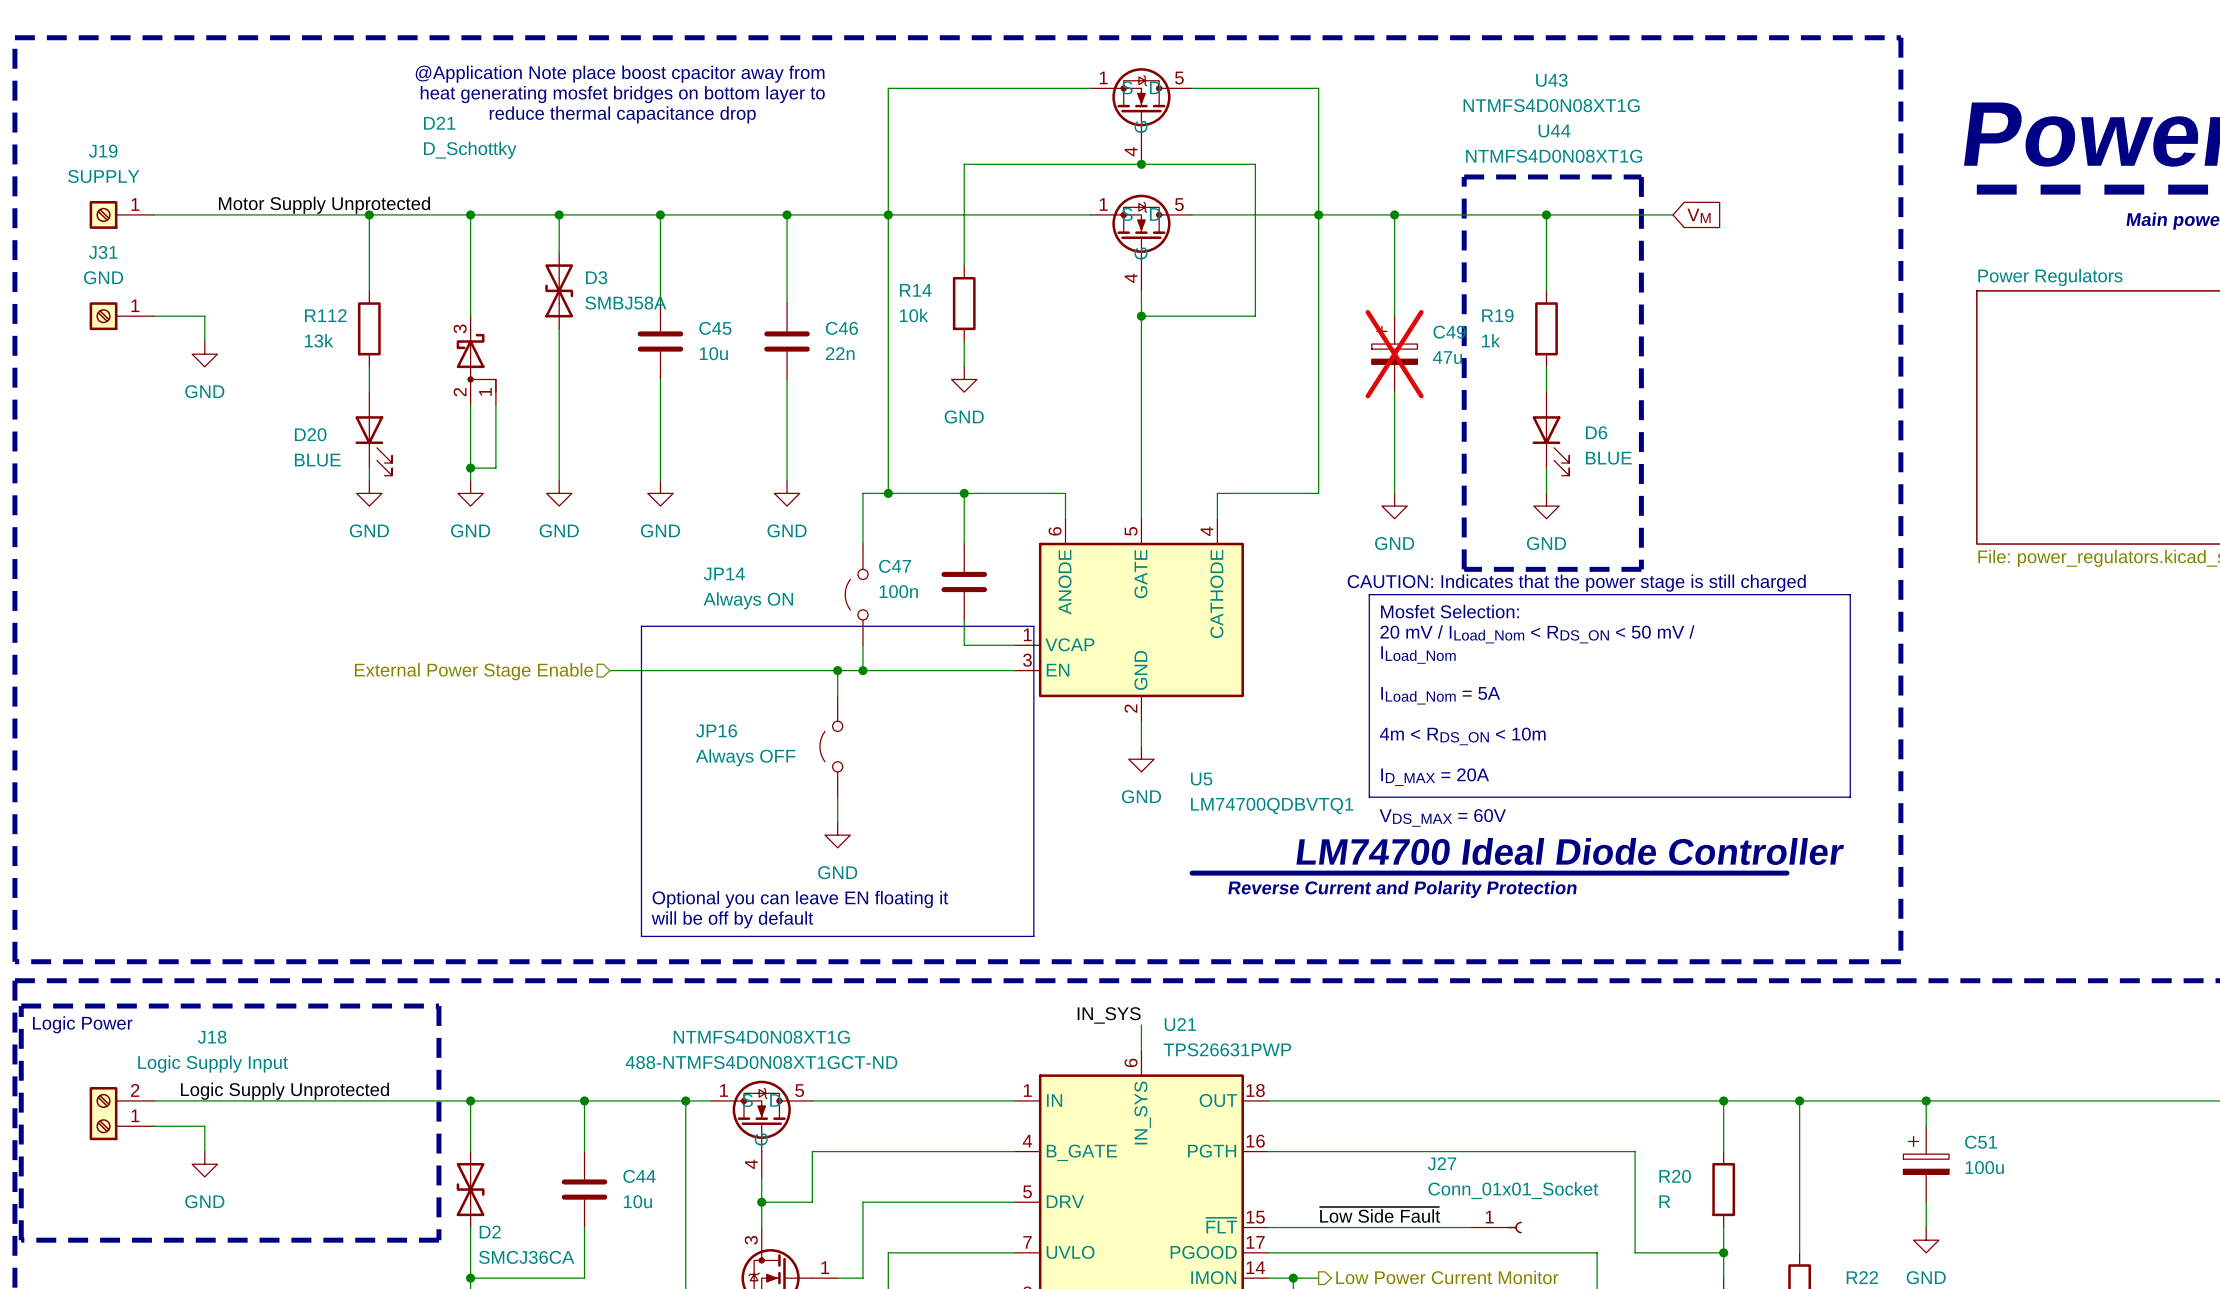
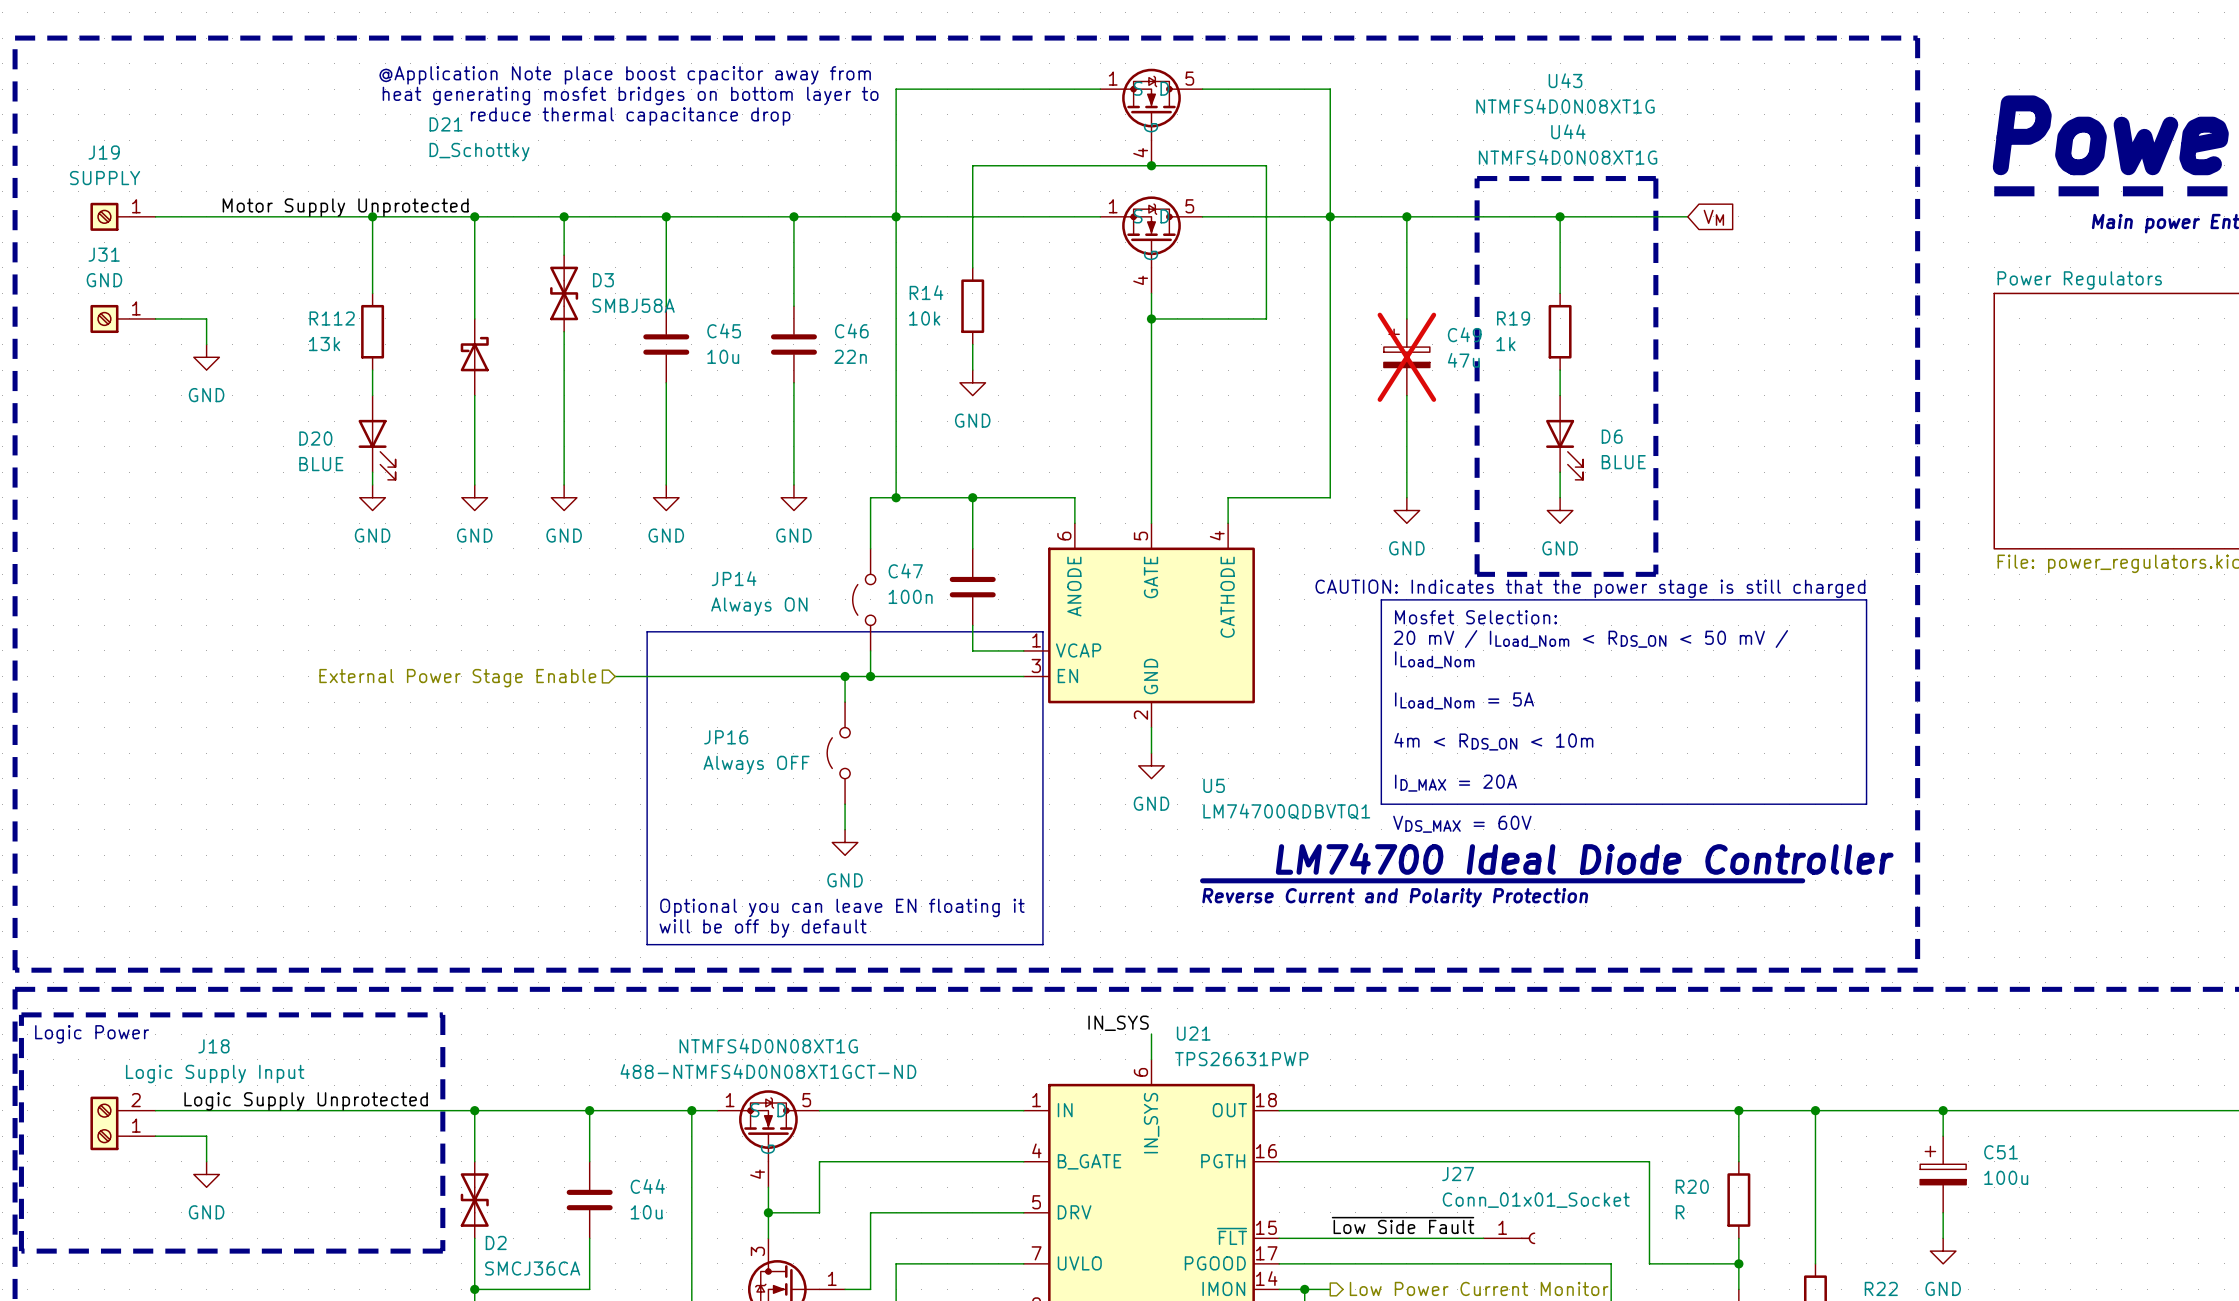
D21 symbol: [456, 316, 496, 405] -> [460, 318, 489, 396]
wire: (495, 404) (495, 468) (470, 468) -> none
junction: (470, 468) -> none

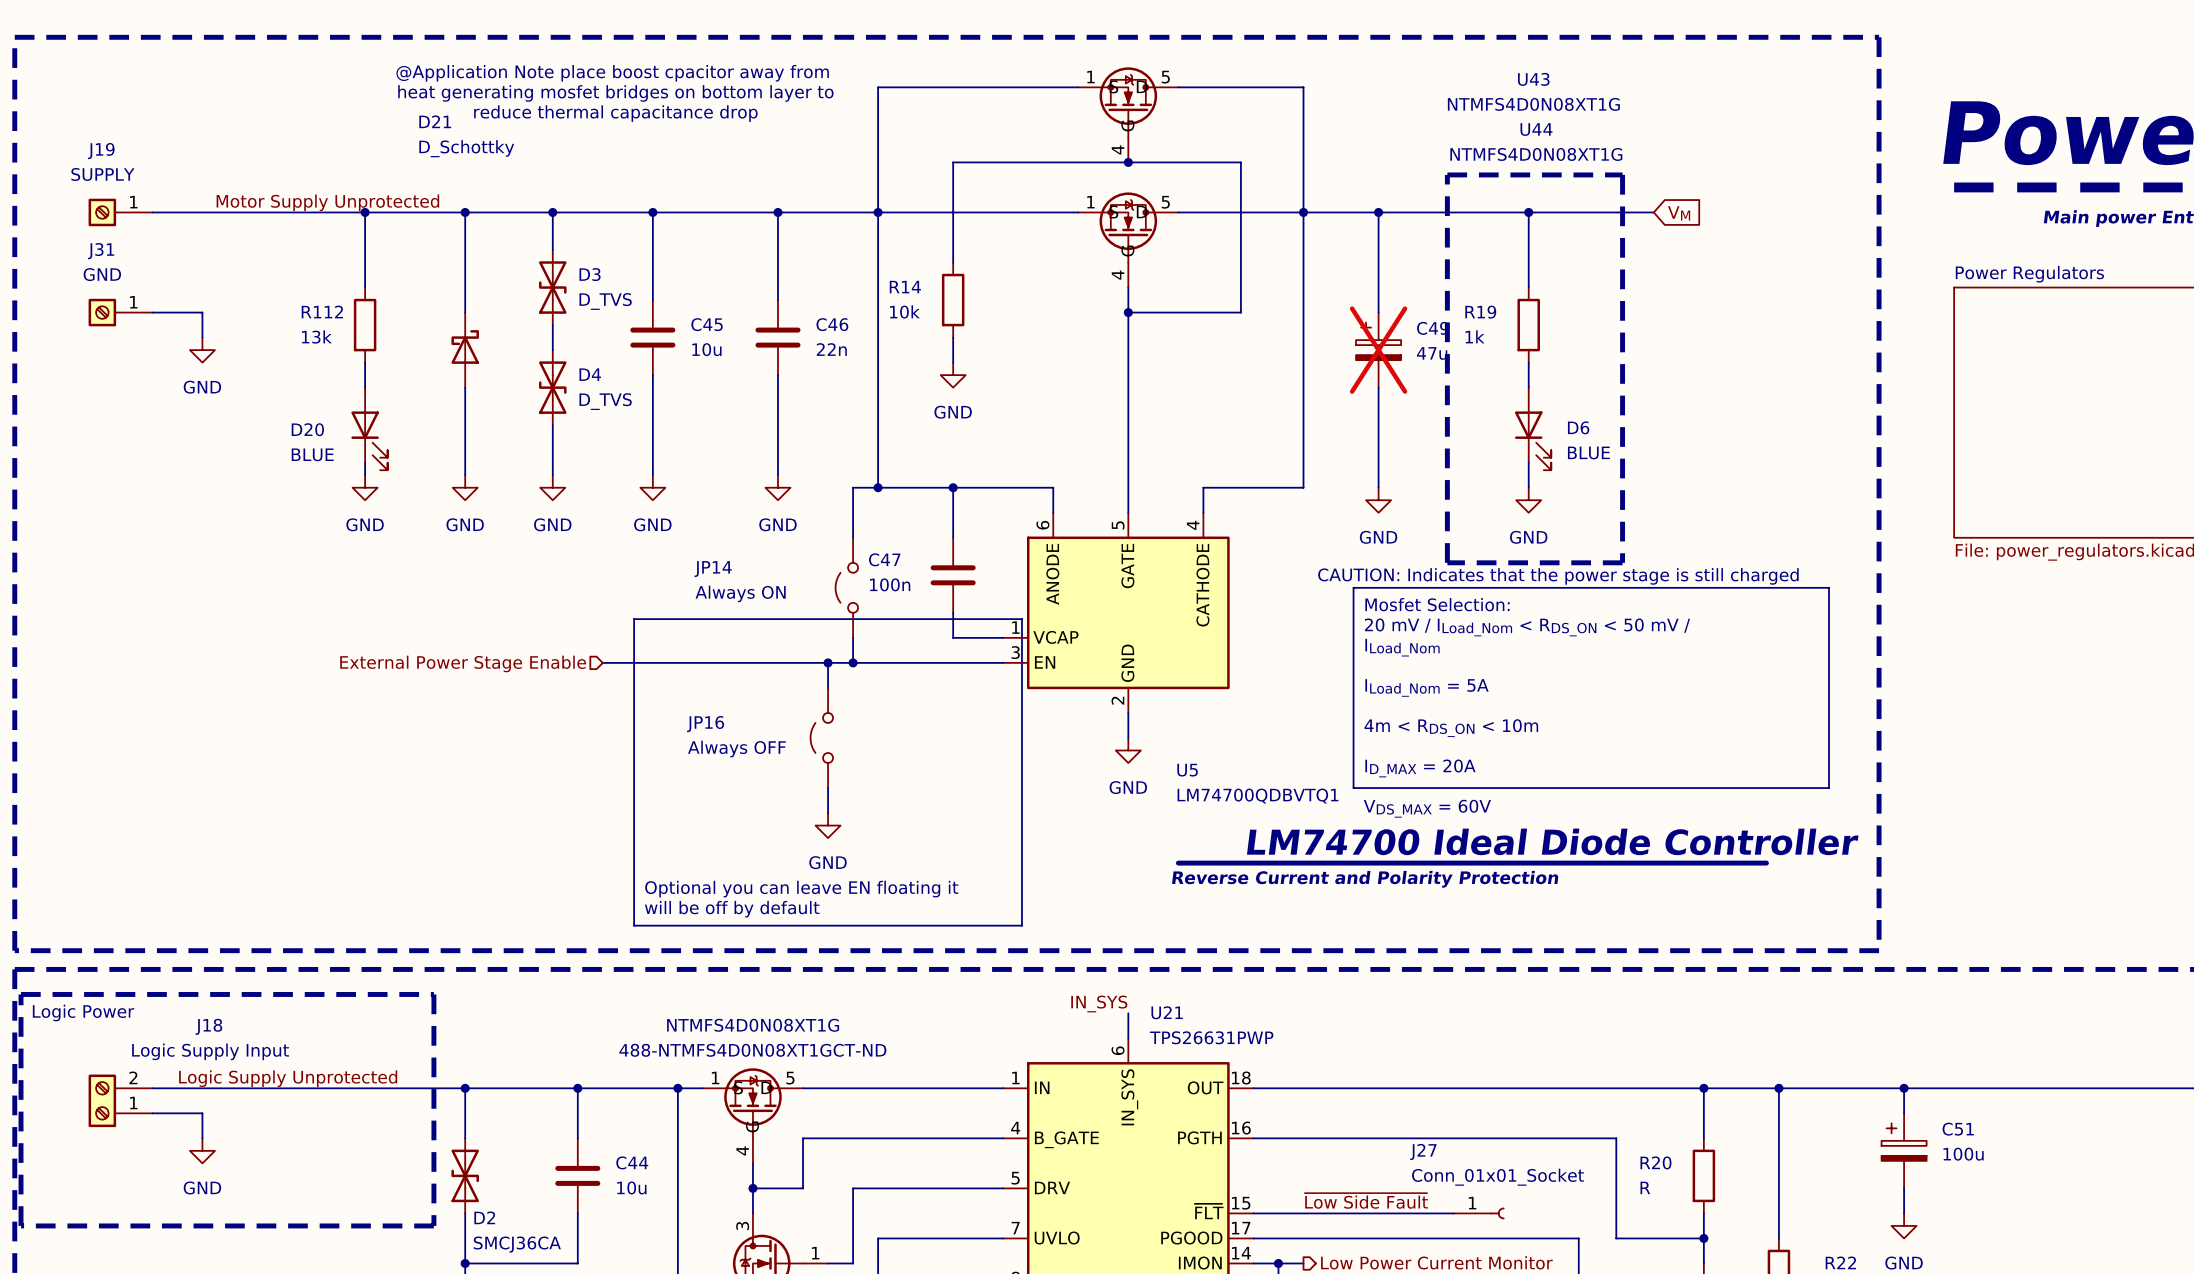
D3 value: SMBJ58A (633, 305) -> D_TVS (605, 301)
D4: none -> D_TVS (552, 387)

